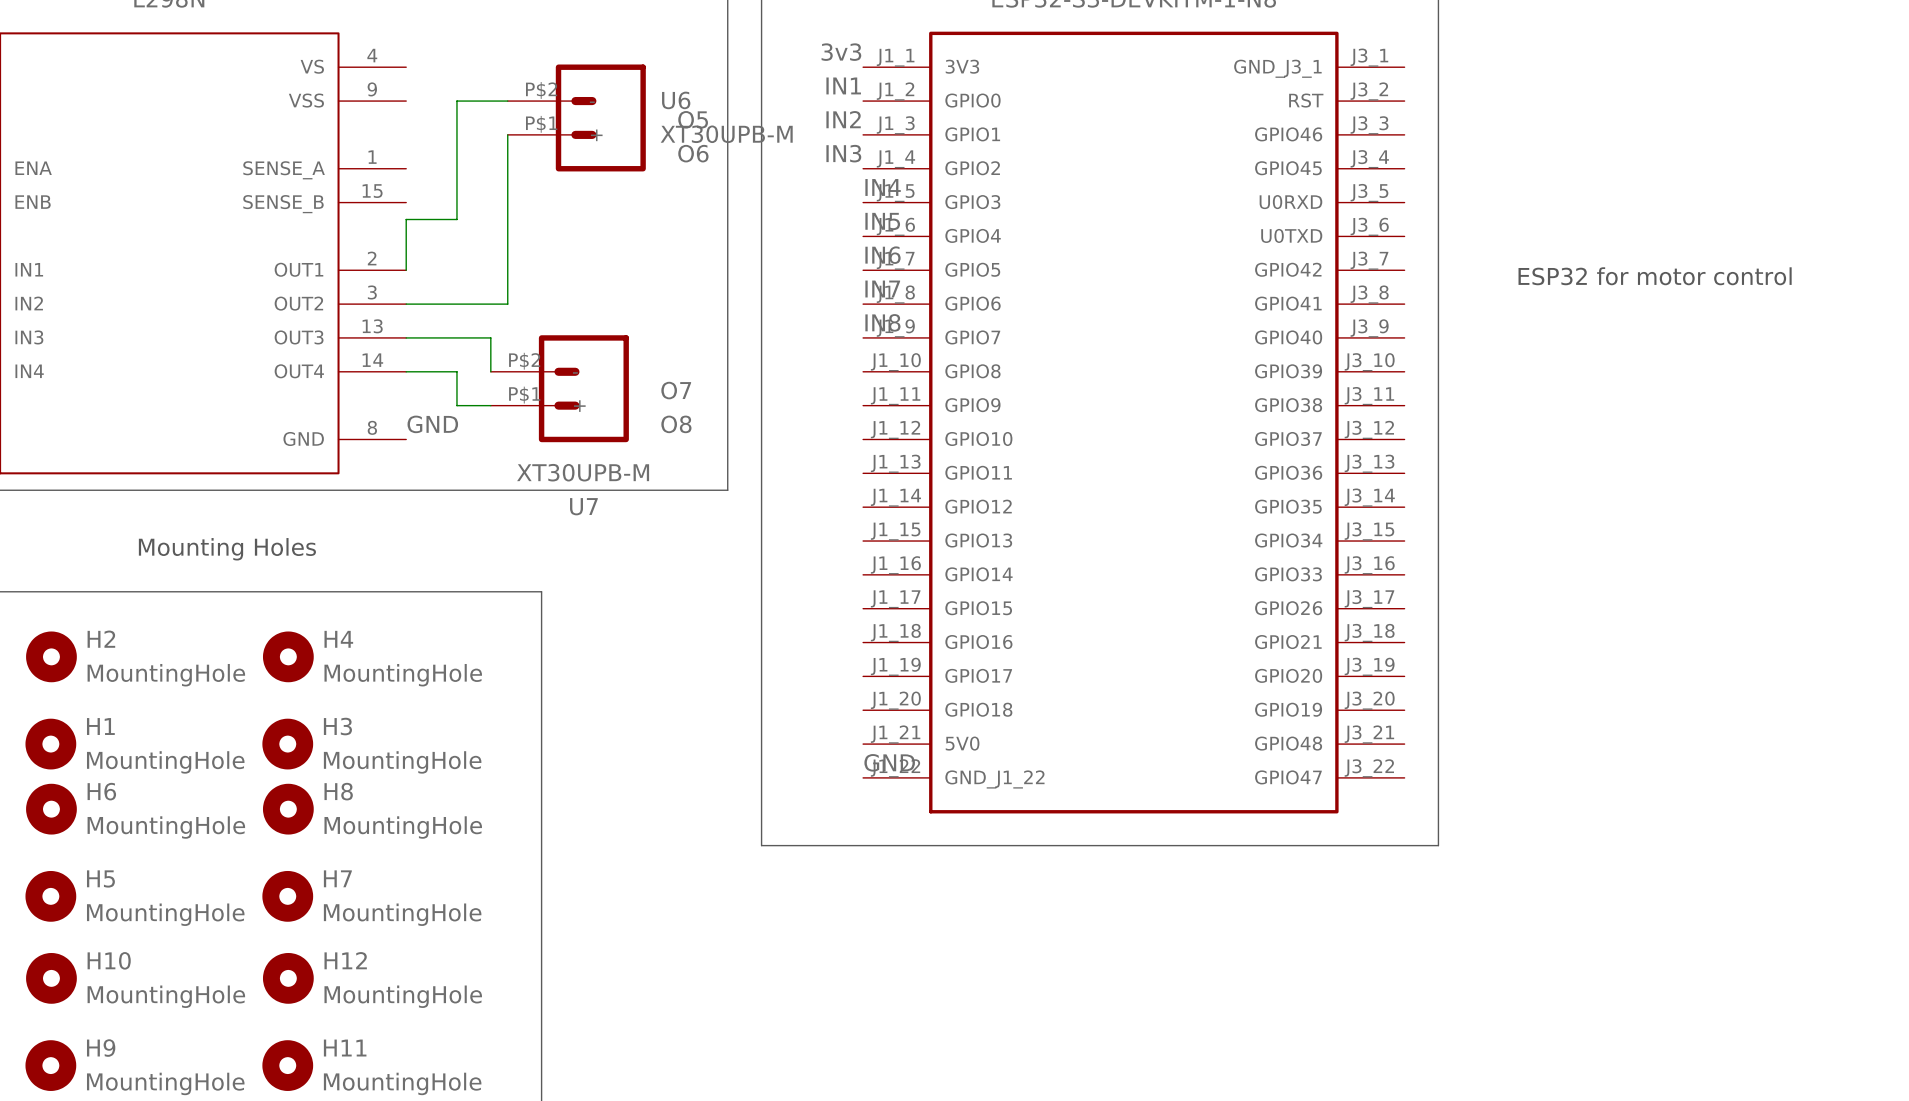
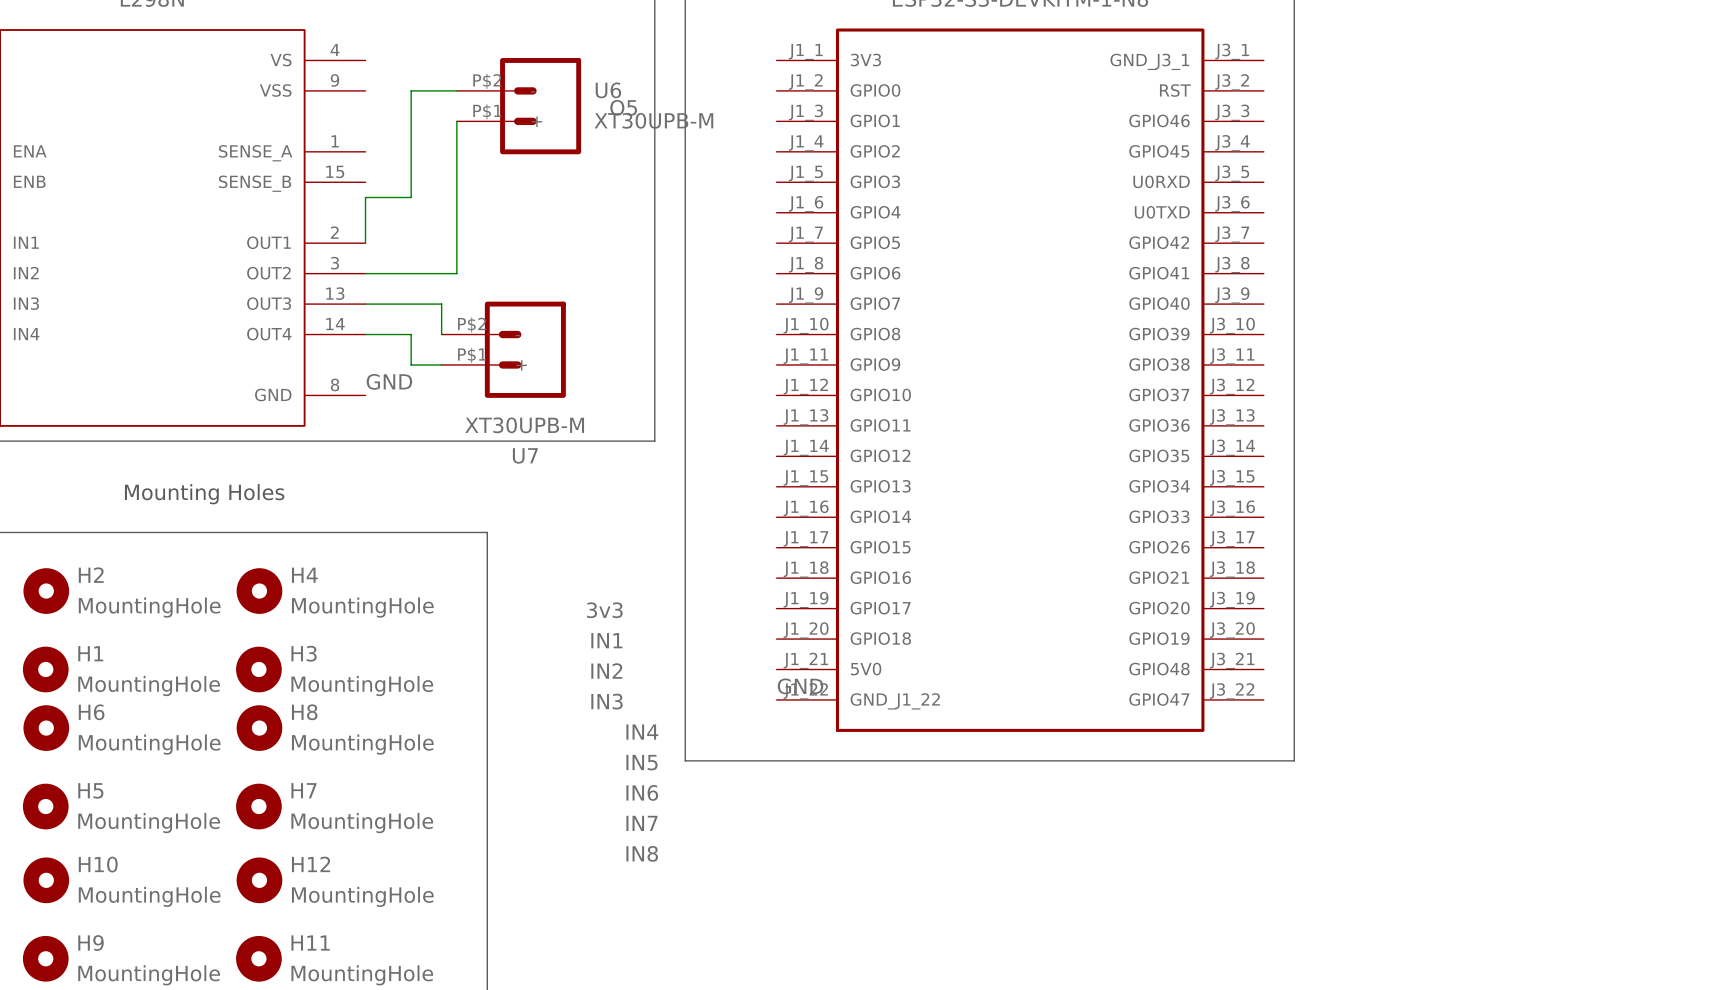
label: 3v3 (841, 52) -> none
label: IN1 (843, 85) -> none
label: IN2 (843, 119) -> none
label: O6 (693, 153) -> none
label: IN3 (843, 153) -> none
label: IN4 (883, 187) -> none
label: IN5 (882, 221) -> none
label: IN6 (882, 255) -> none
text: ESP32 for motor control (1655, 276) -> none
label: IN7 (882, 289) -> none
label: IN8 (882, 322) -> none
label: O7 (676, 390) -> none
label: O8 (676, 424) -> none
label: none -> 3v3 (604, 610)
label: none -> IN1 (606, 640)
label: none -> IN2 (606, 671)
label: none -> IN3 (606, 701)
label: none -> IN4 (642, 732)
label: none -> IN5 (641, 762)
label: none -> IN6 (642, 792)
label: none -> IN7 (642, 823)
label: none -> IN8 (642, 853)

